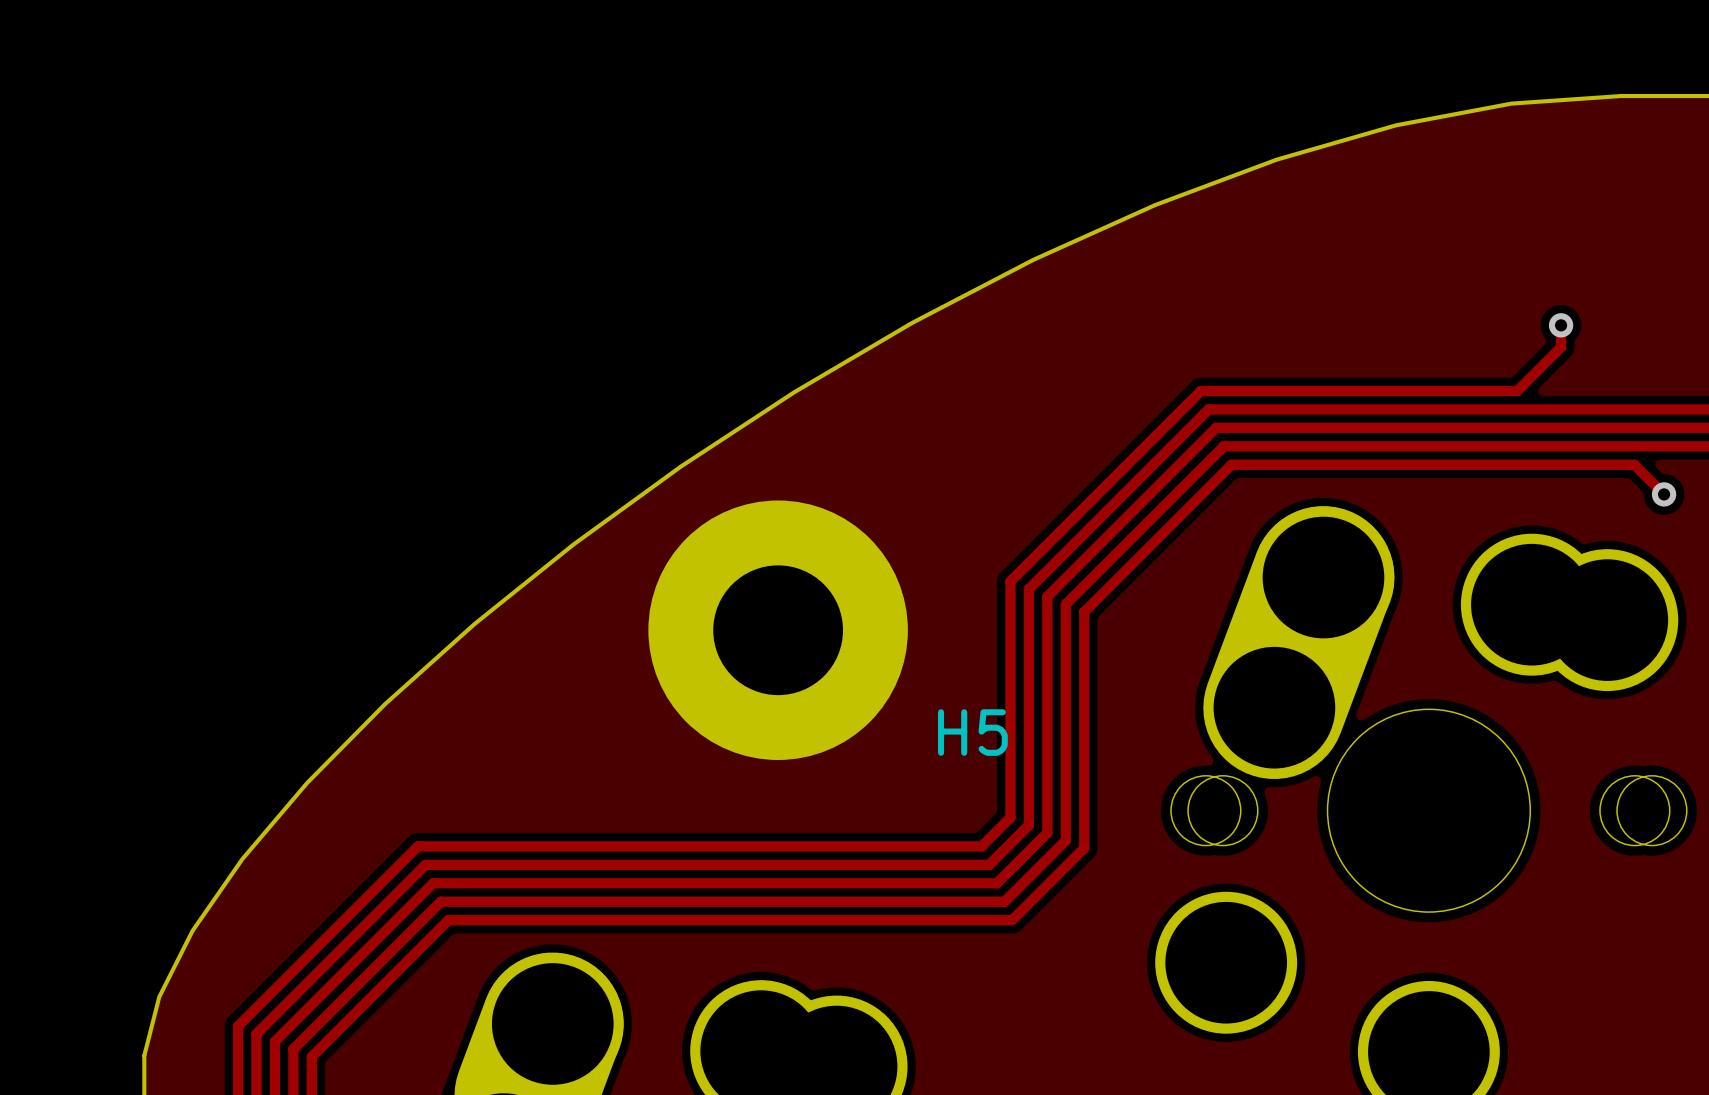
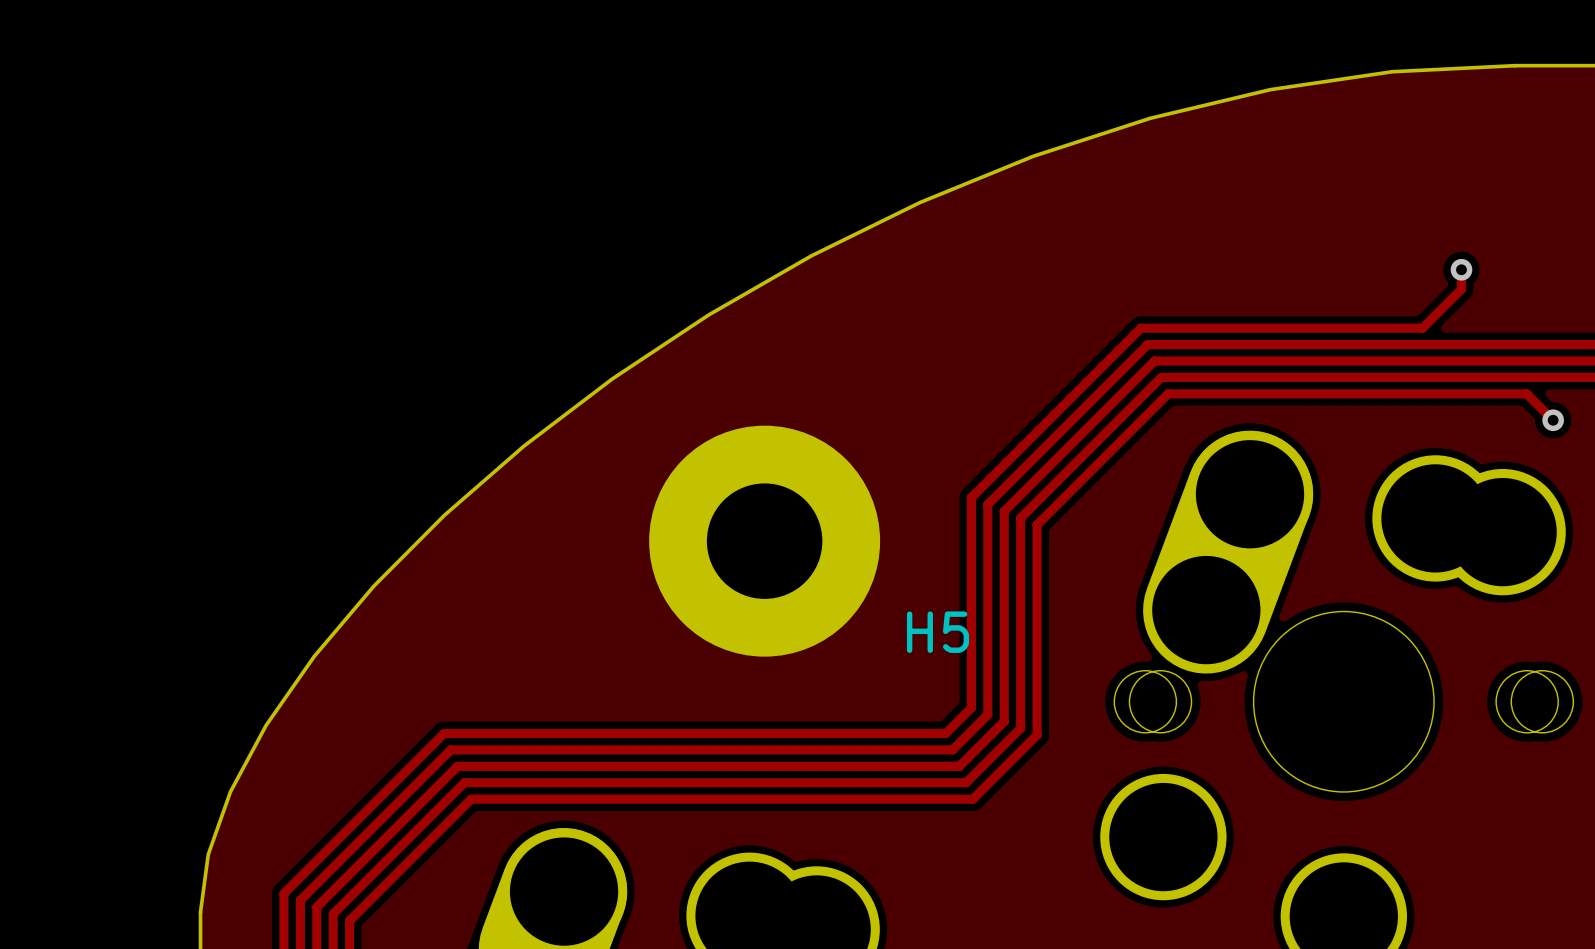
board edge: (1621, 96) (1511, 103) (1396, 125) (1276, 159) (1155, 205) (1033, 259) (912, 322) (794, 392) (680, 466) (573, 544) (474, 624) (385, 704) (307, 782) (242, 858) (192, 930) (159, 996) (144, 1055) -> (1515, 65) (1392, 71) (1270, 89) (1150, 118) (1033, 156) (920, 202) (811, 255) (708, 314) (612, 378) (524, 446) (444, 515) (373, 586) (314, 656) (266, 725) (230, 791) (208, 854) (200, 919)

